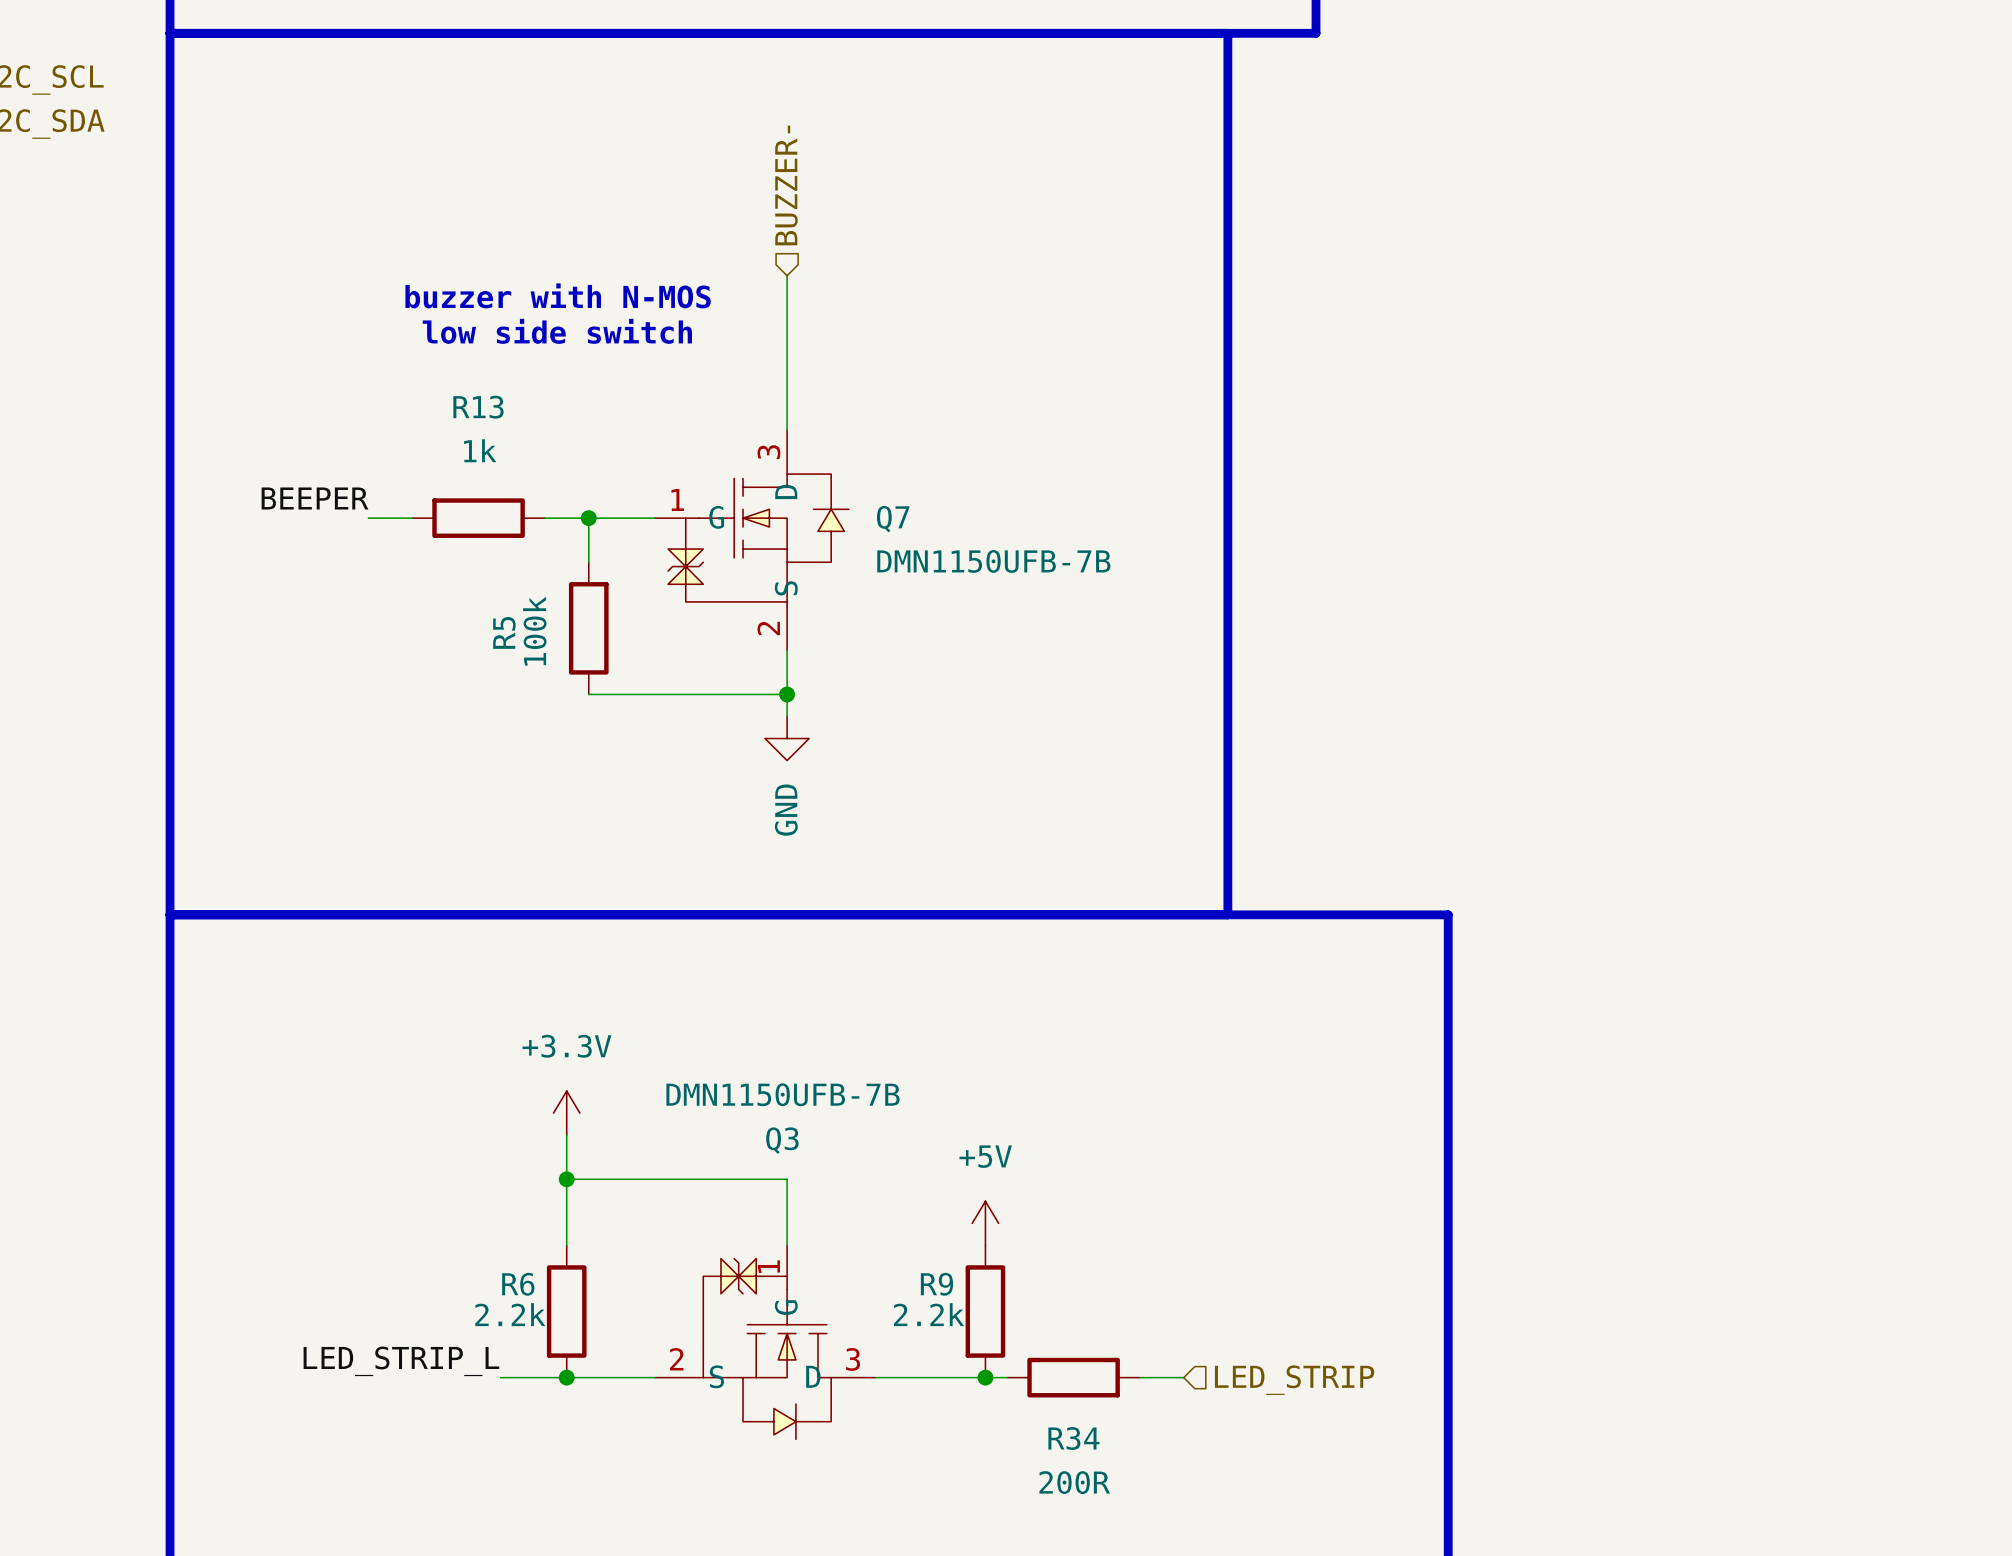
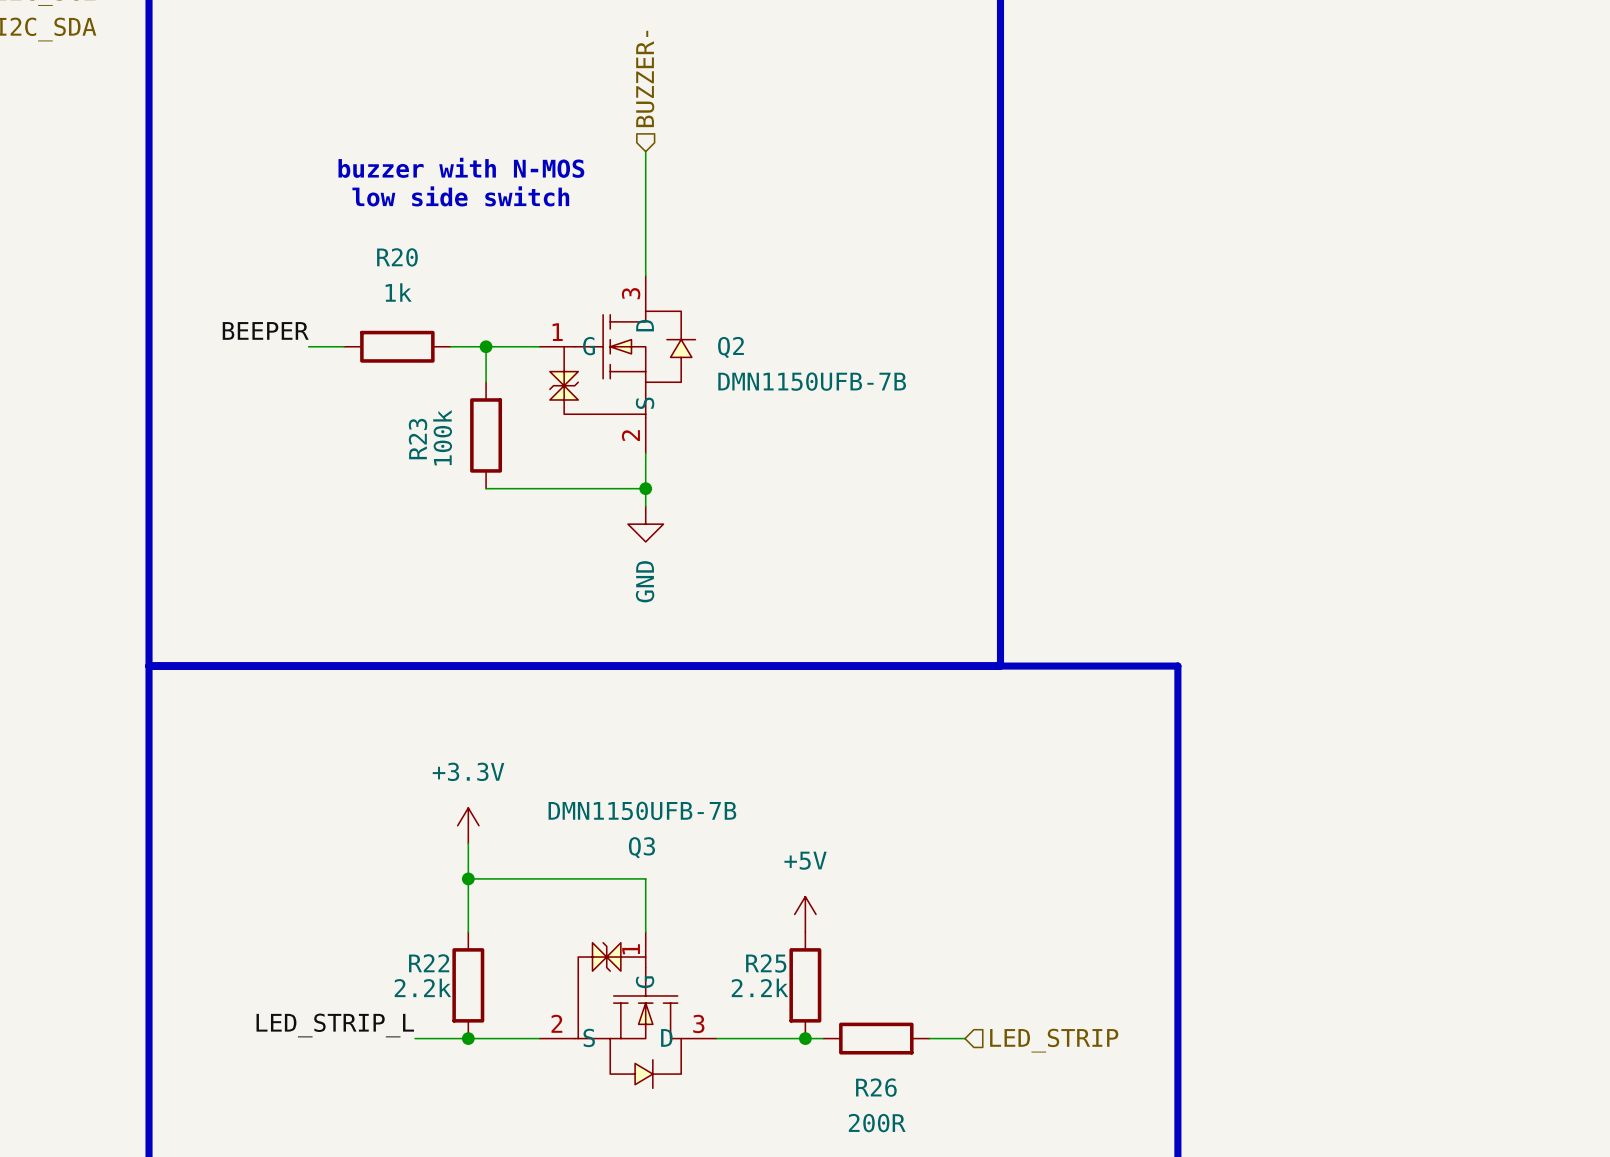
R13 name: R13 (478, 407) -> R20 (397, 257)
Q7 name: Q7 (893, 519) -> Q2 (730, 347)
R5 name: R5 (504, 632) -> R23 (418, 439)
R6 name: R6 (518, 1284) -> R22 (429, 963)
R9 name: R9 (936, 1284) -> R25 (766, 963)
R34 name: R34 (1073, 1438) -> R26 (876, 1087)

